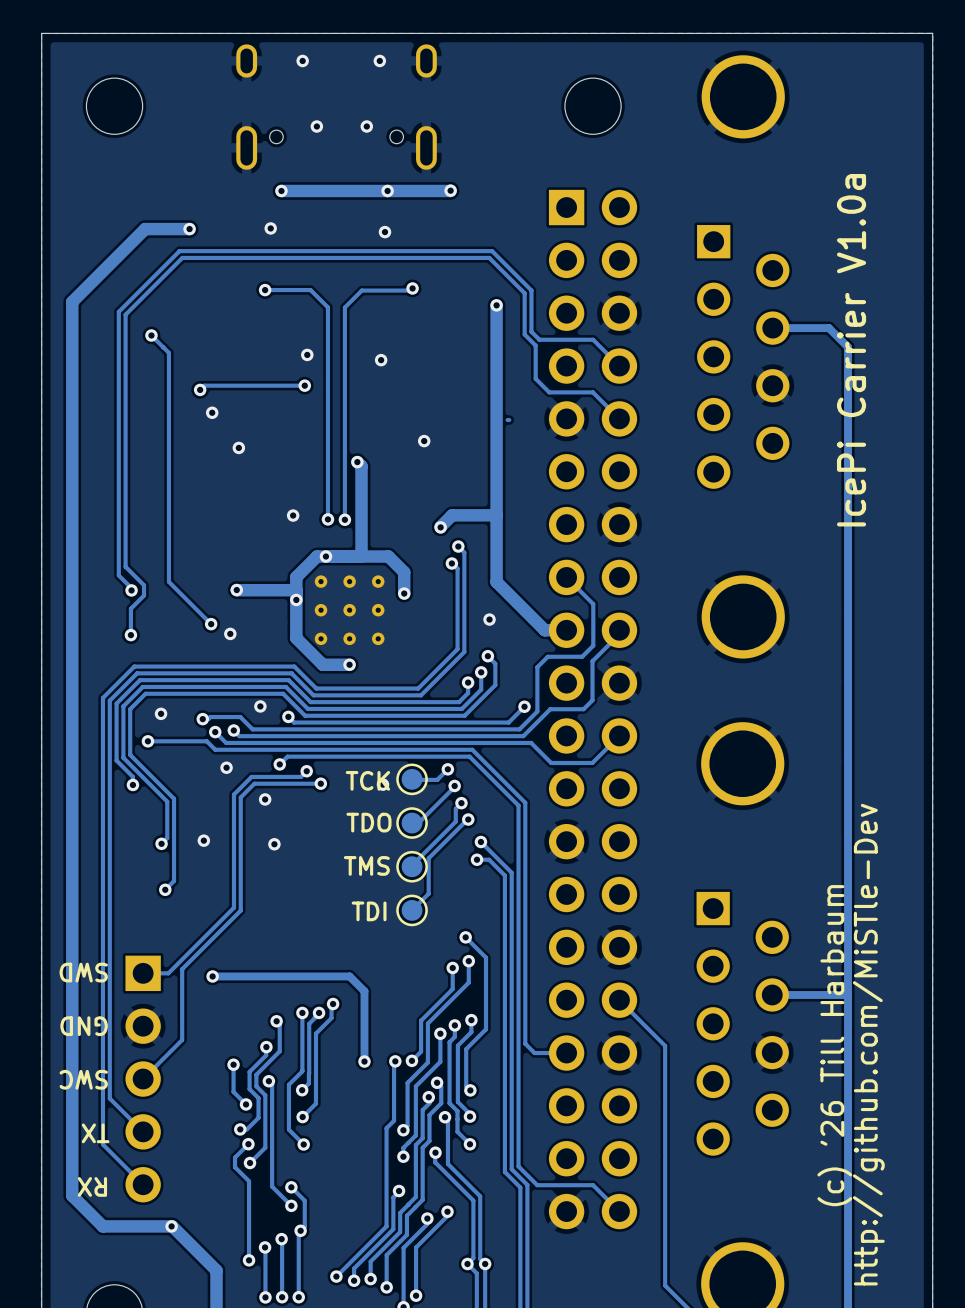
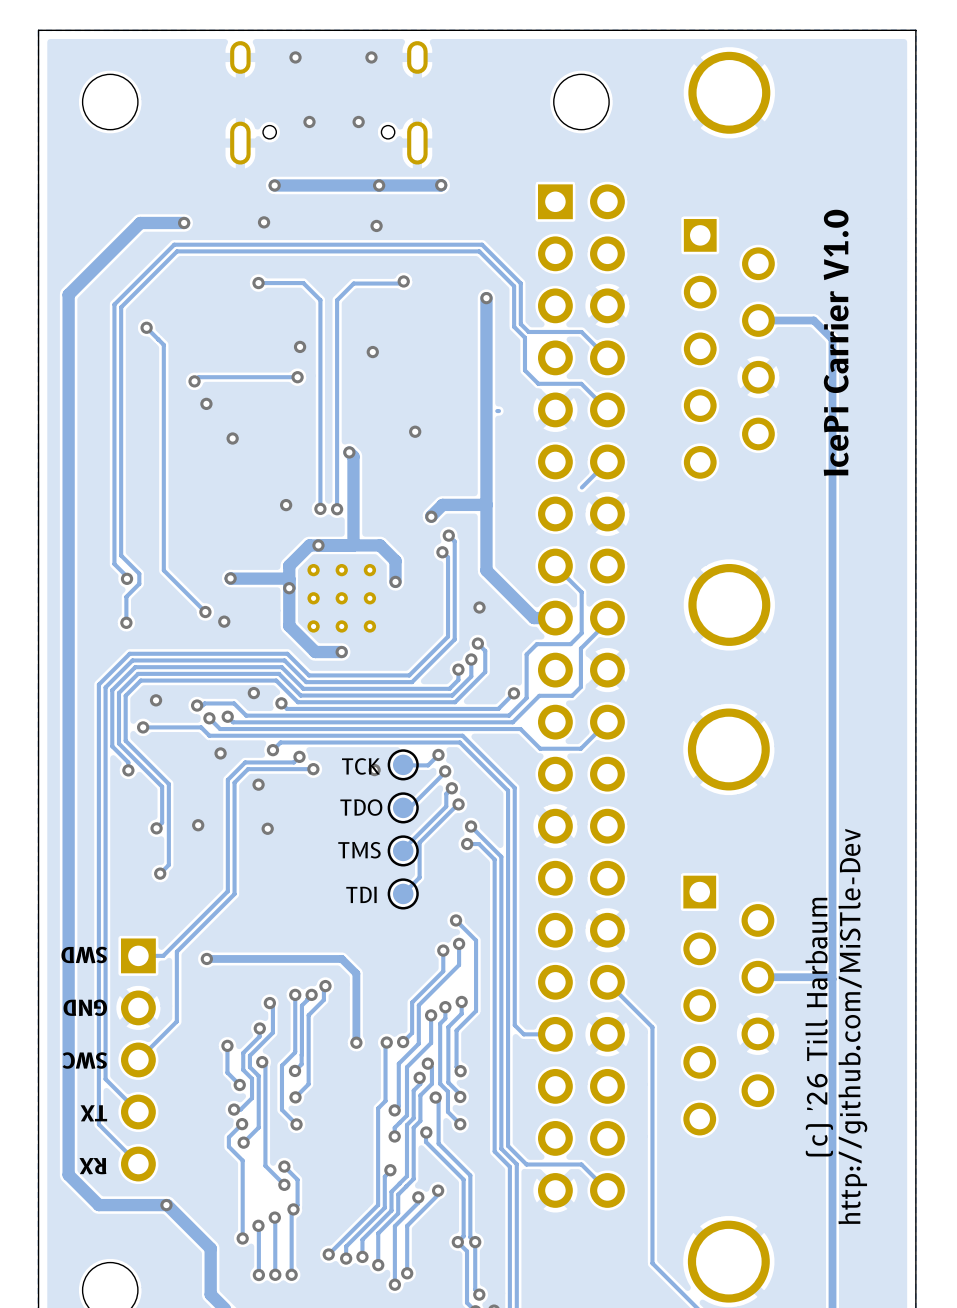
text: IcePi Carrier V1.0a (851, 350) -> IcePi Carrier V1.0 (836, 342)
track: none -> (607, 461) (581, 487)

